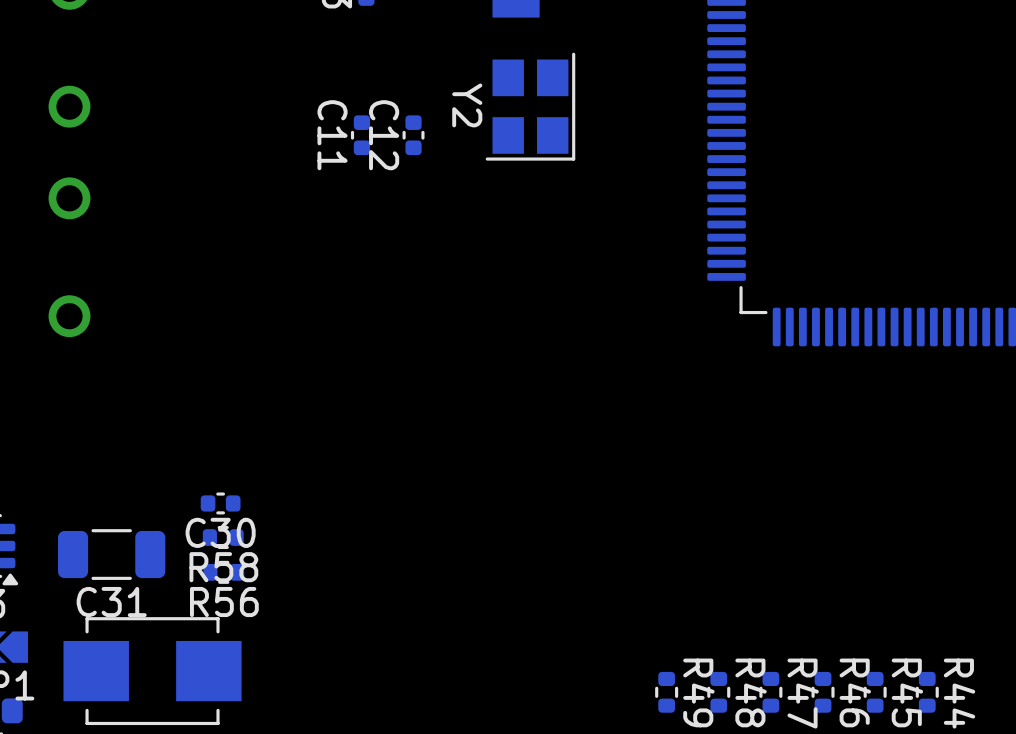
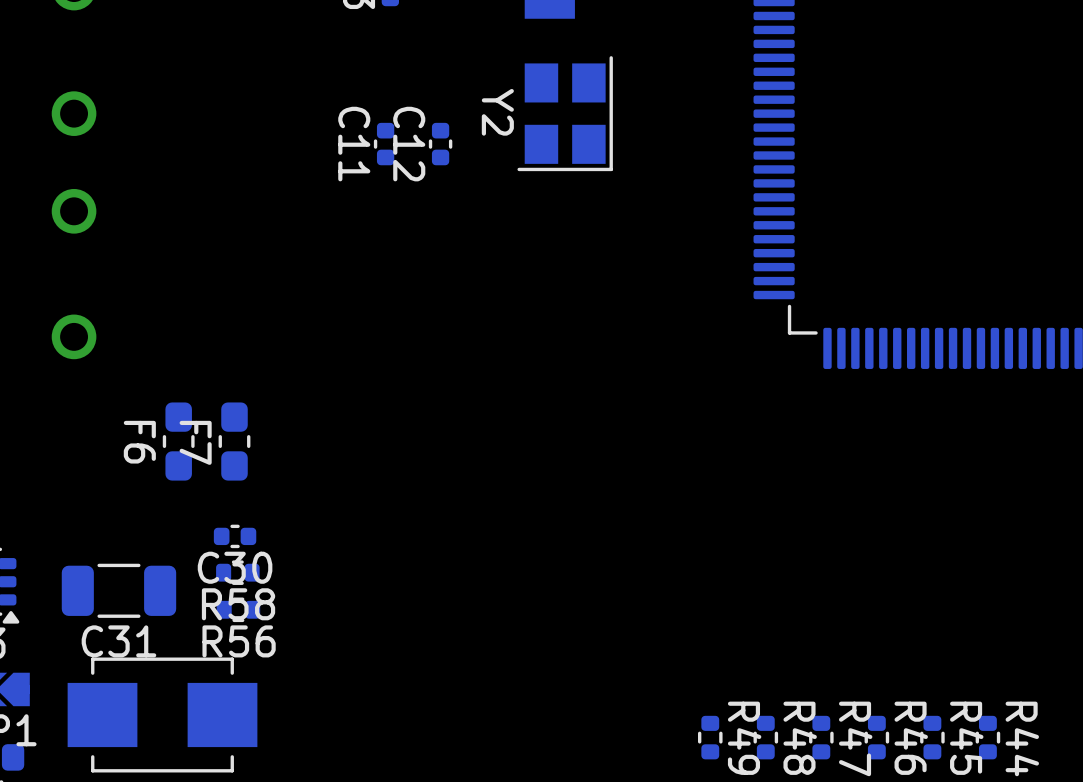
F6: none -> (178, 441)
F7: none -> (234, 441)

